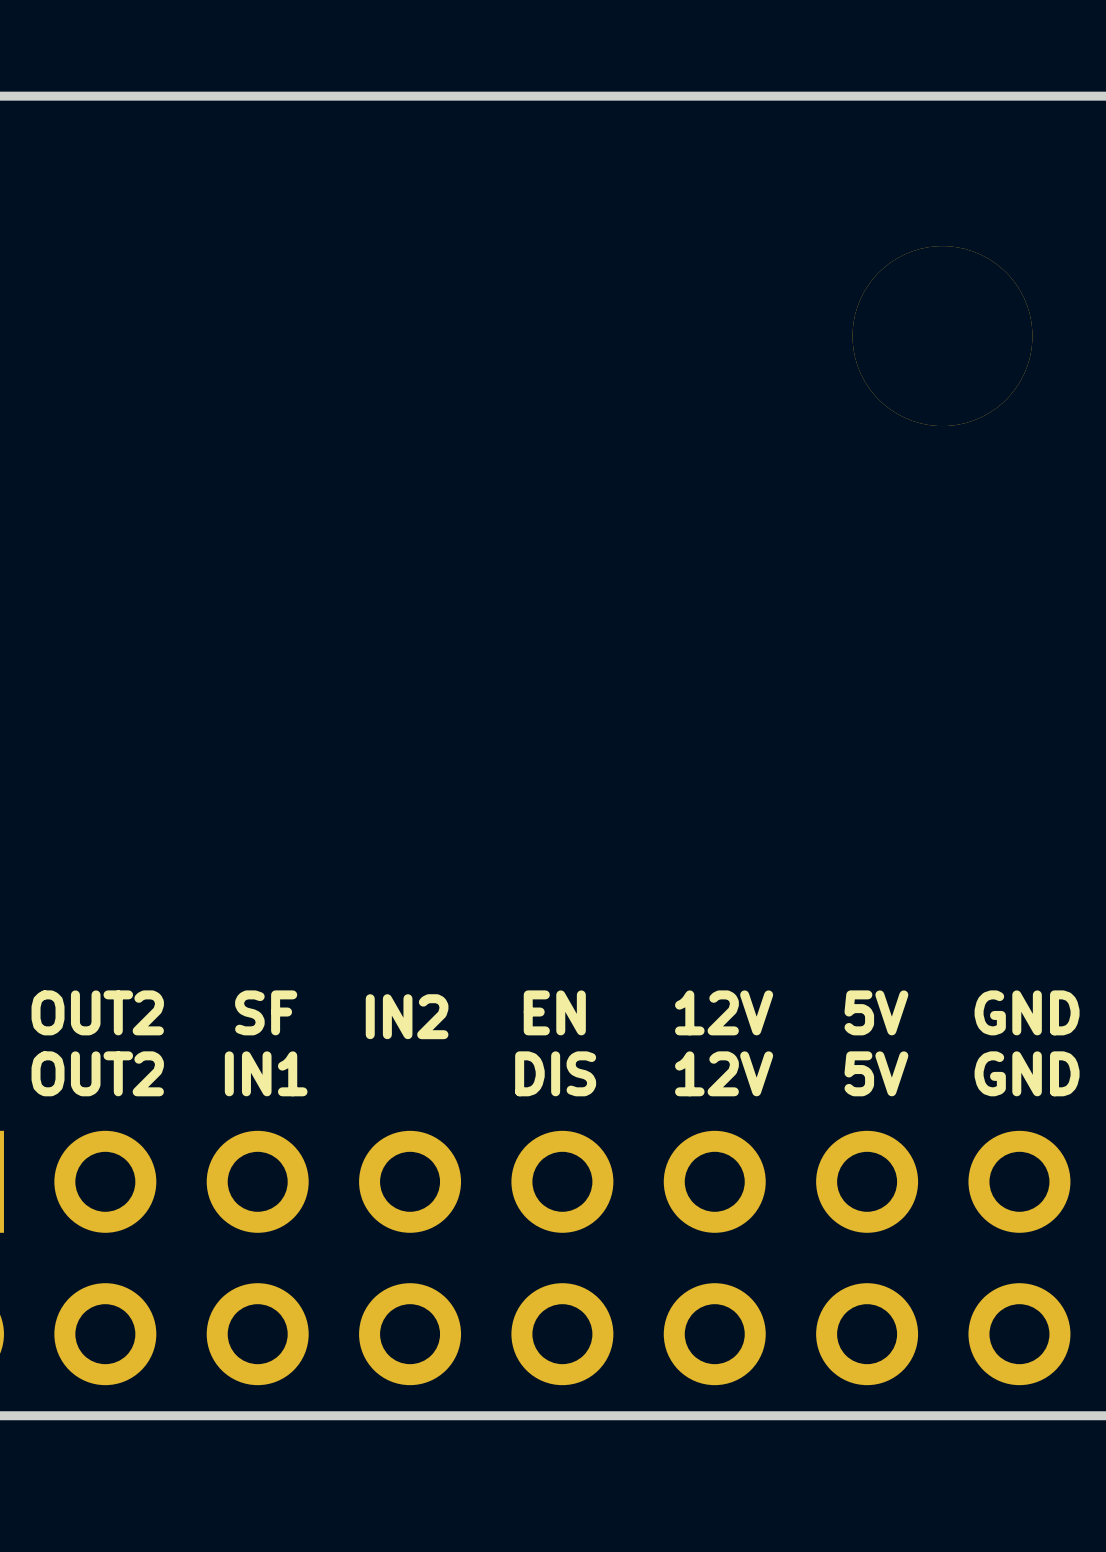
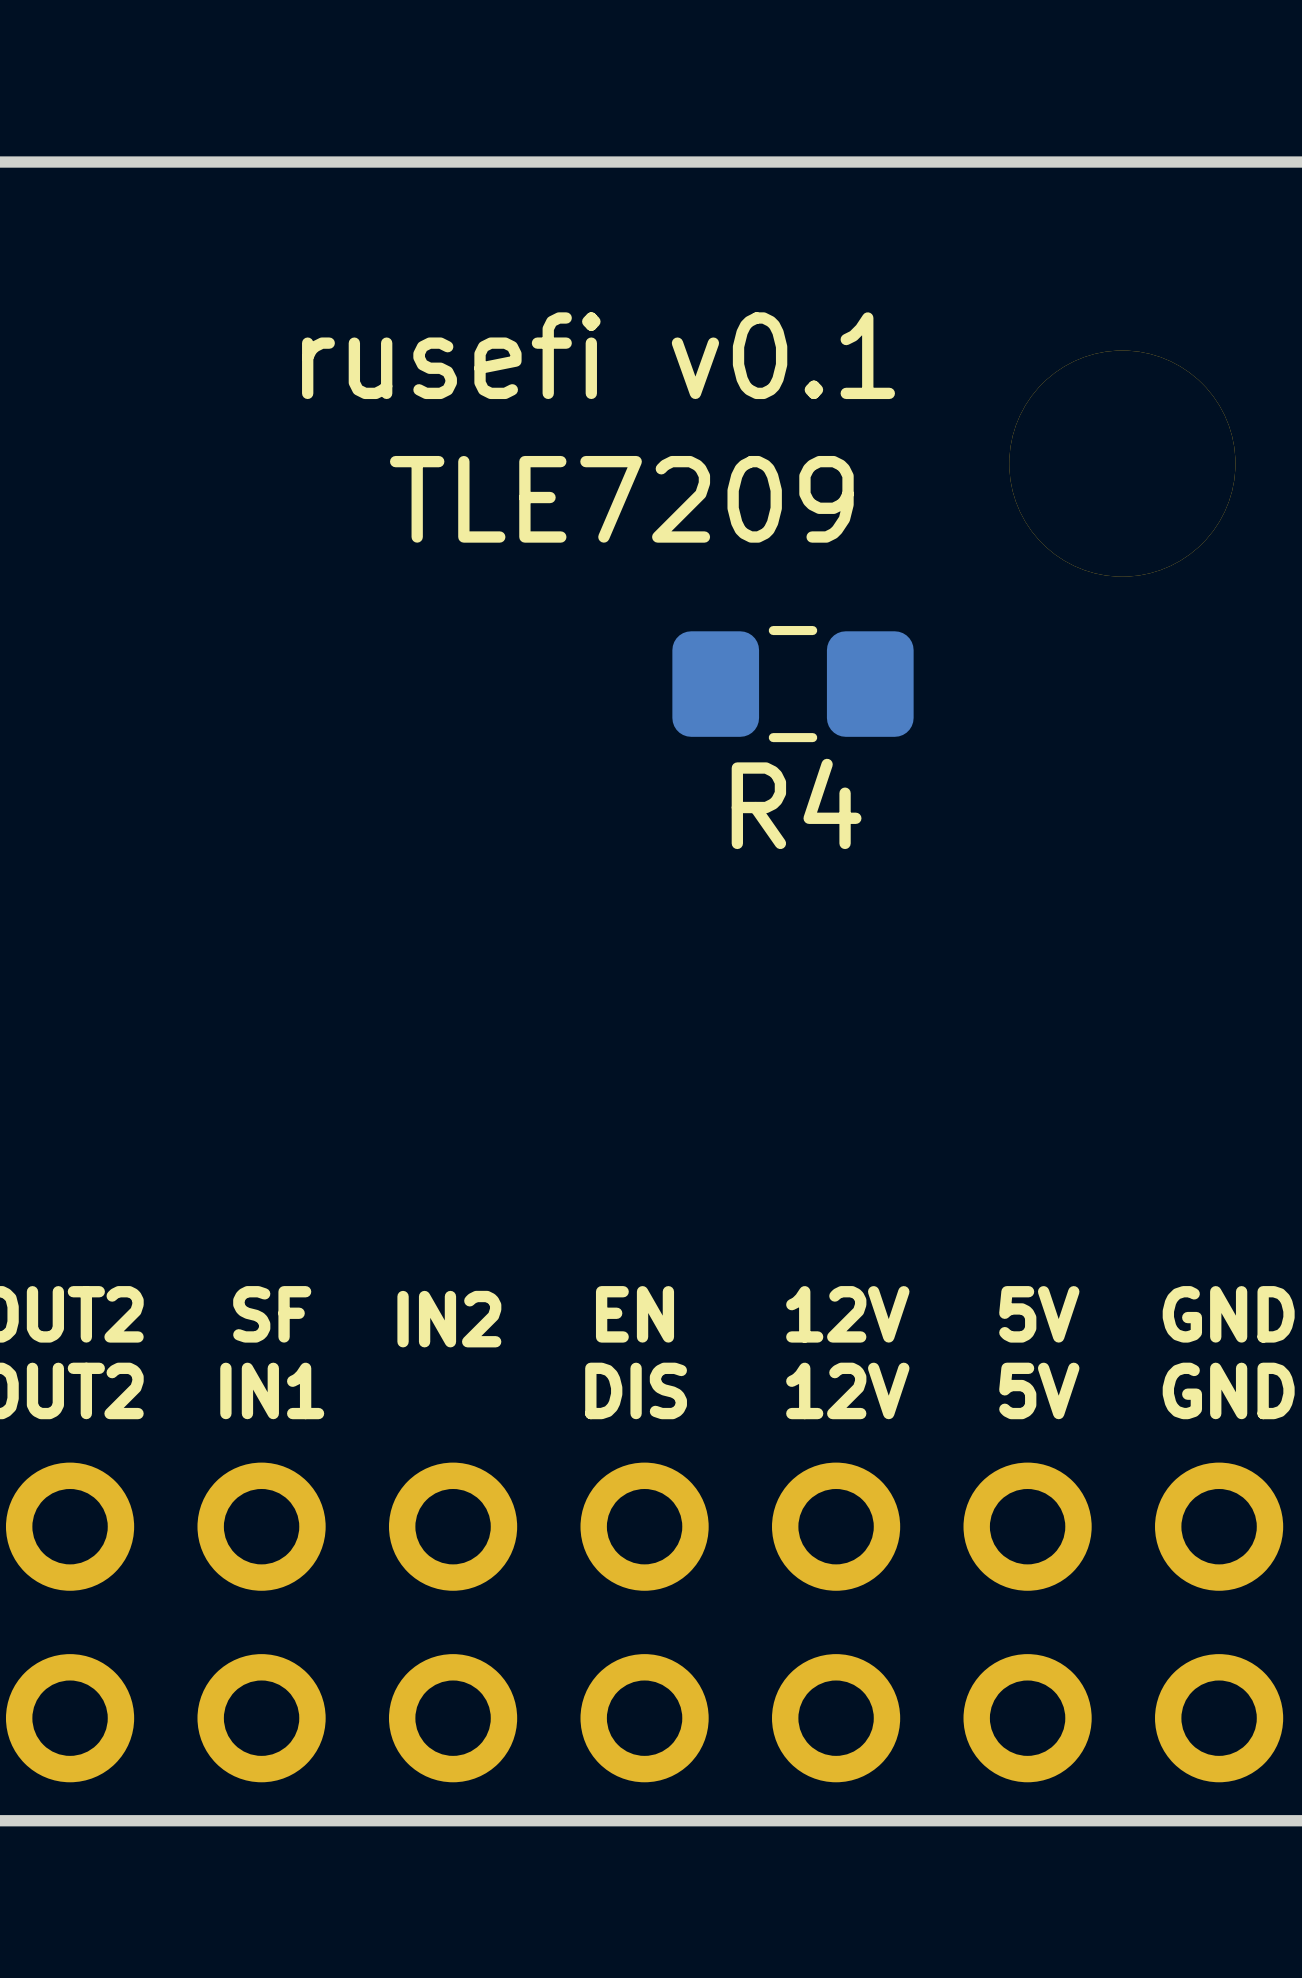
text: none -> rusefi v0.1 (598, 355)
text: none -> TLE7209 (621, 499)
R4: none -> (792, 684)

